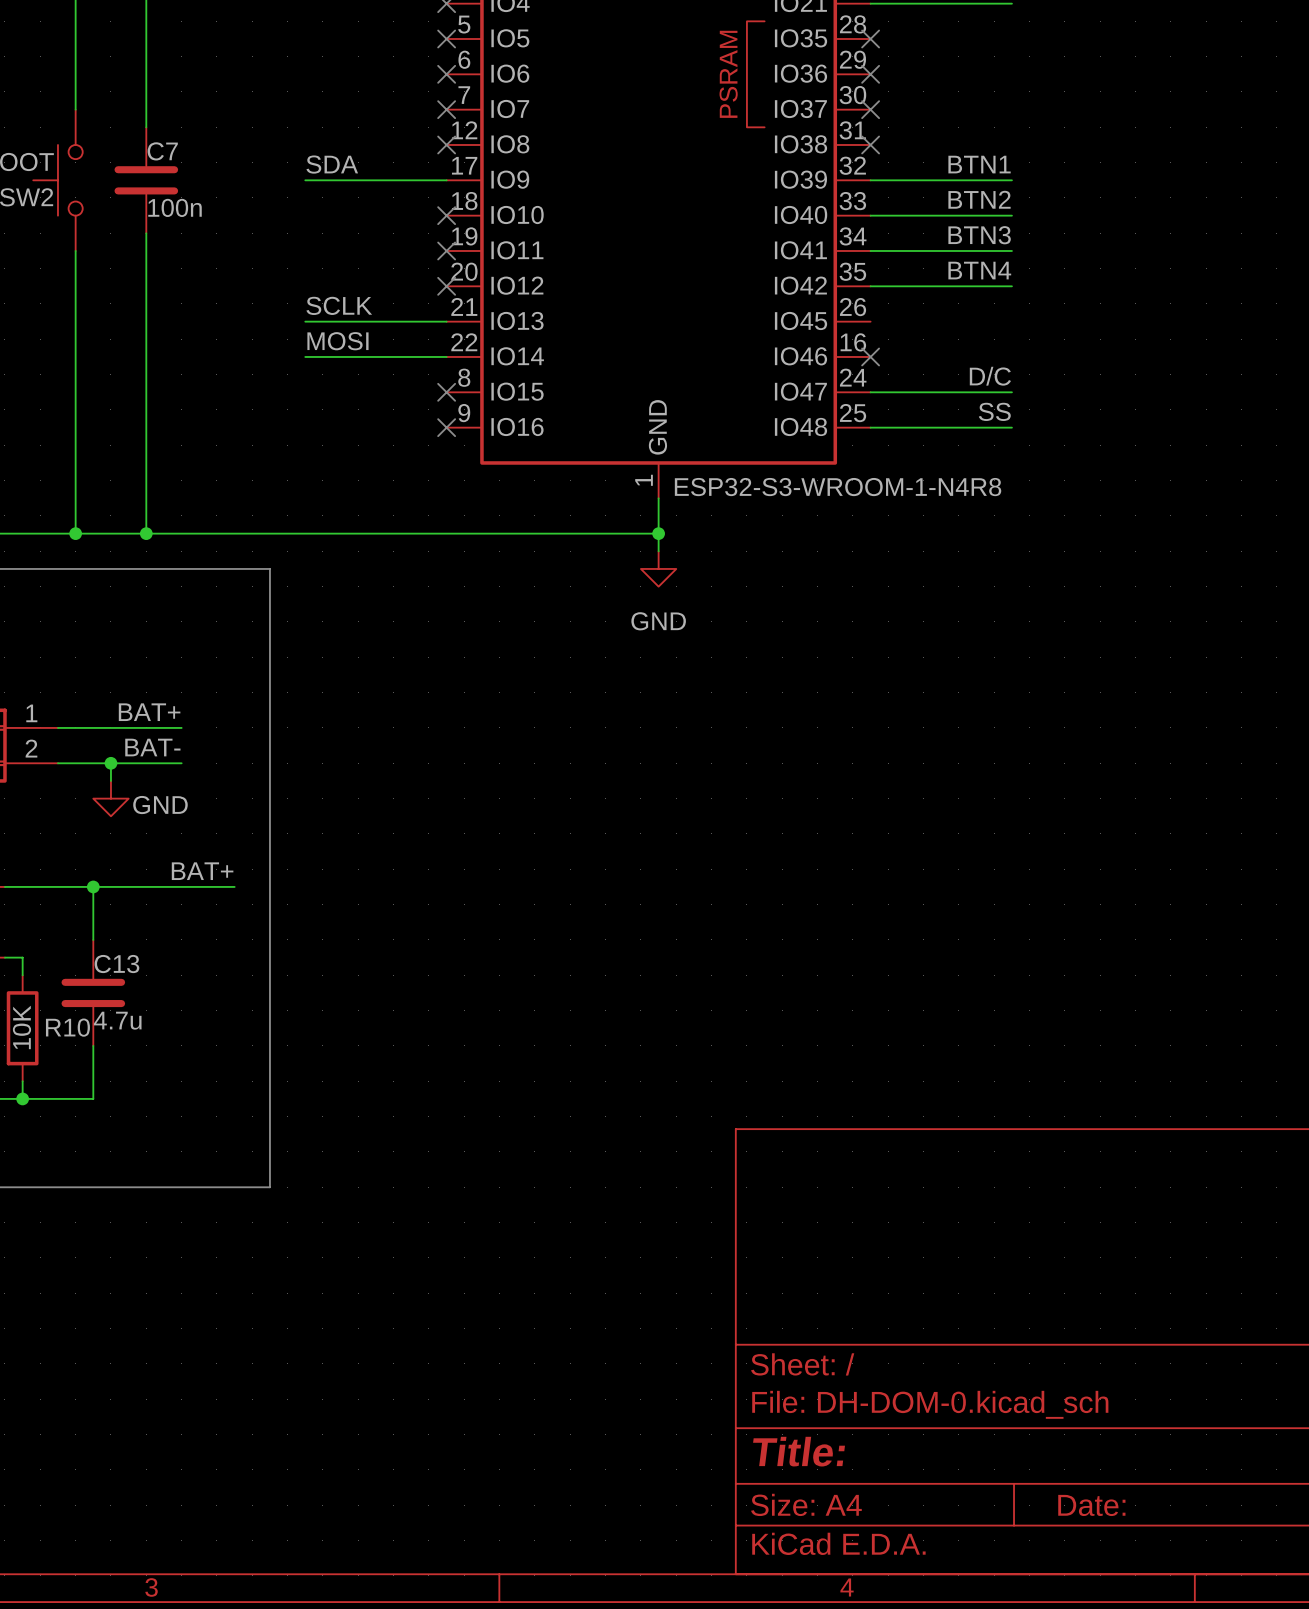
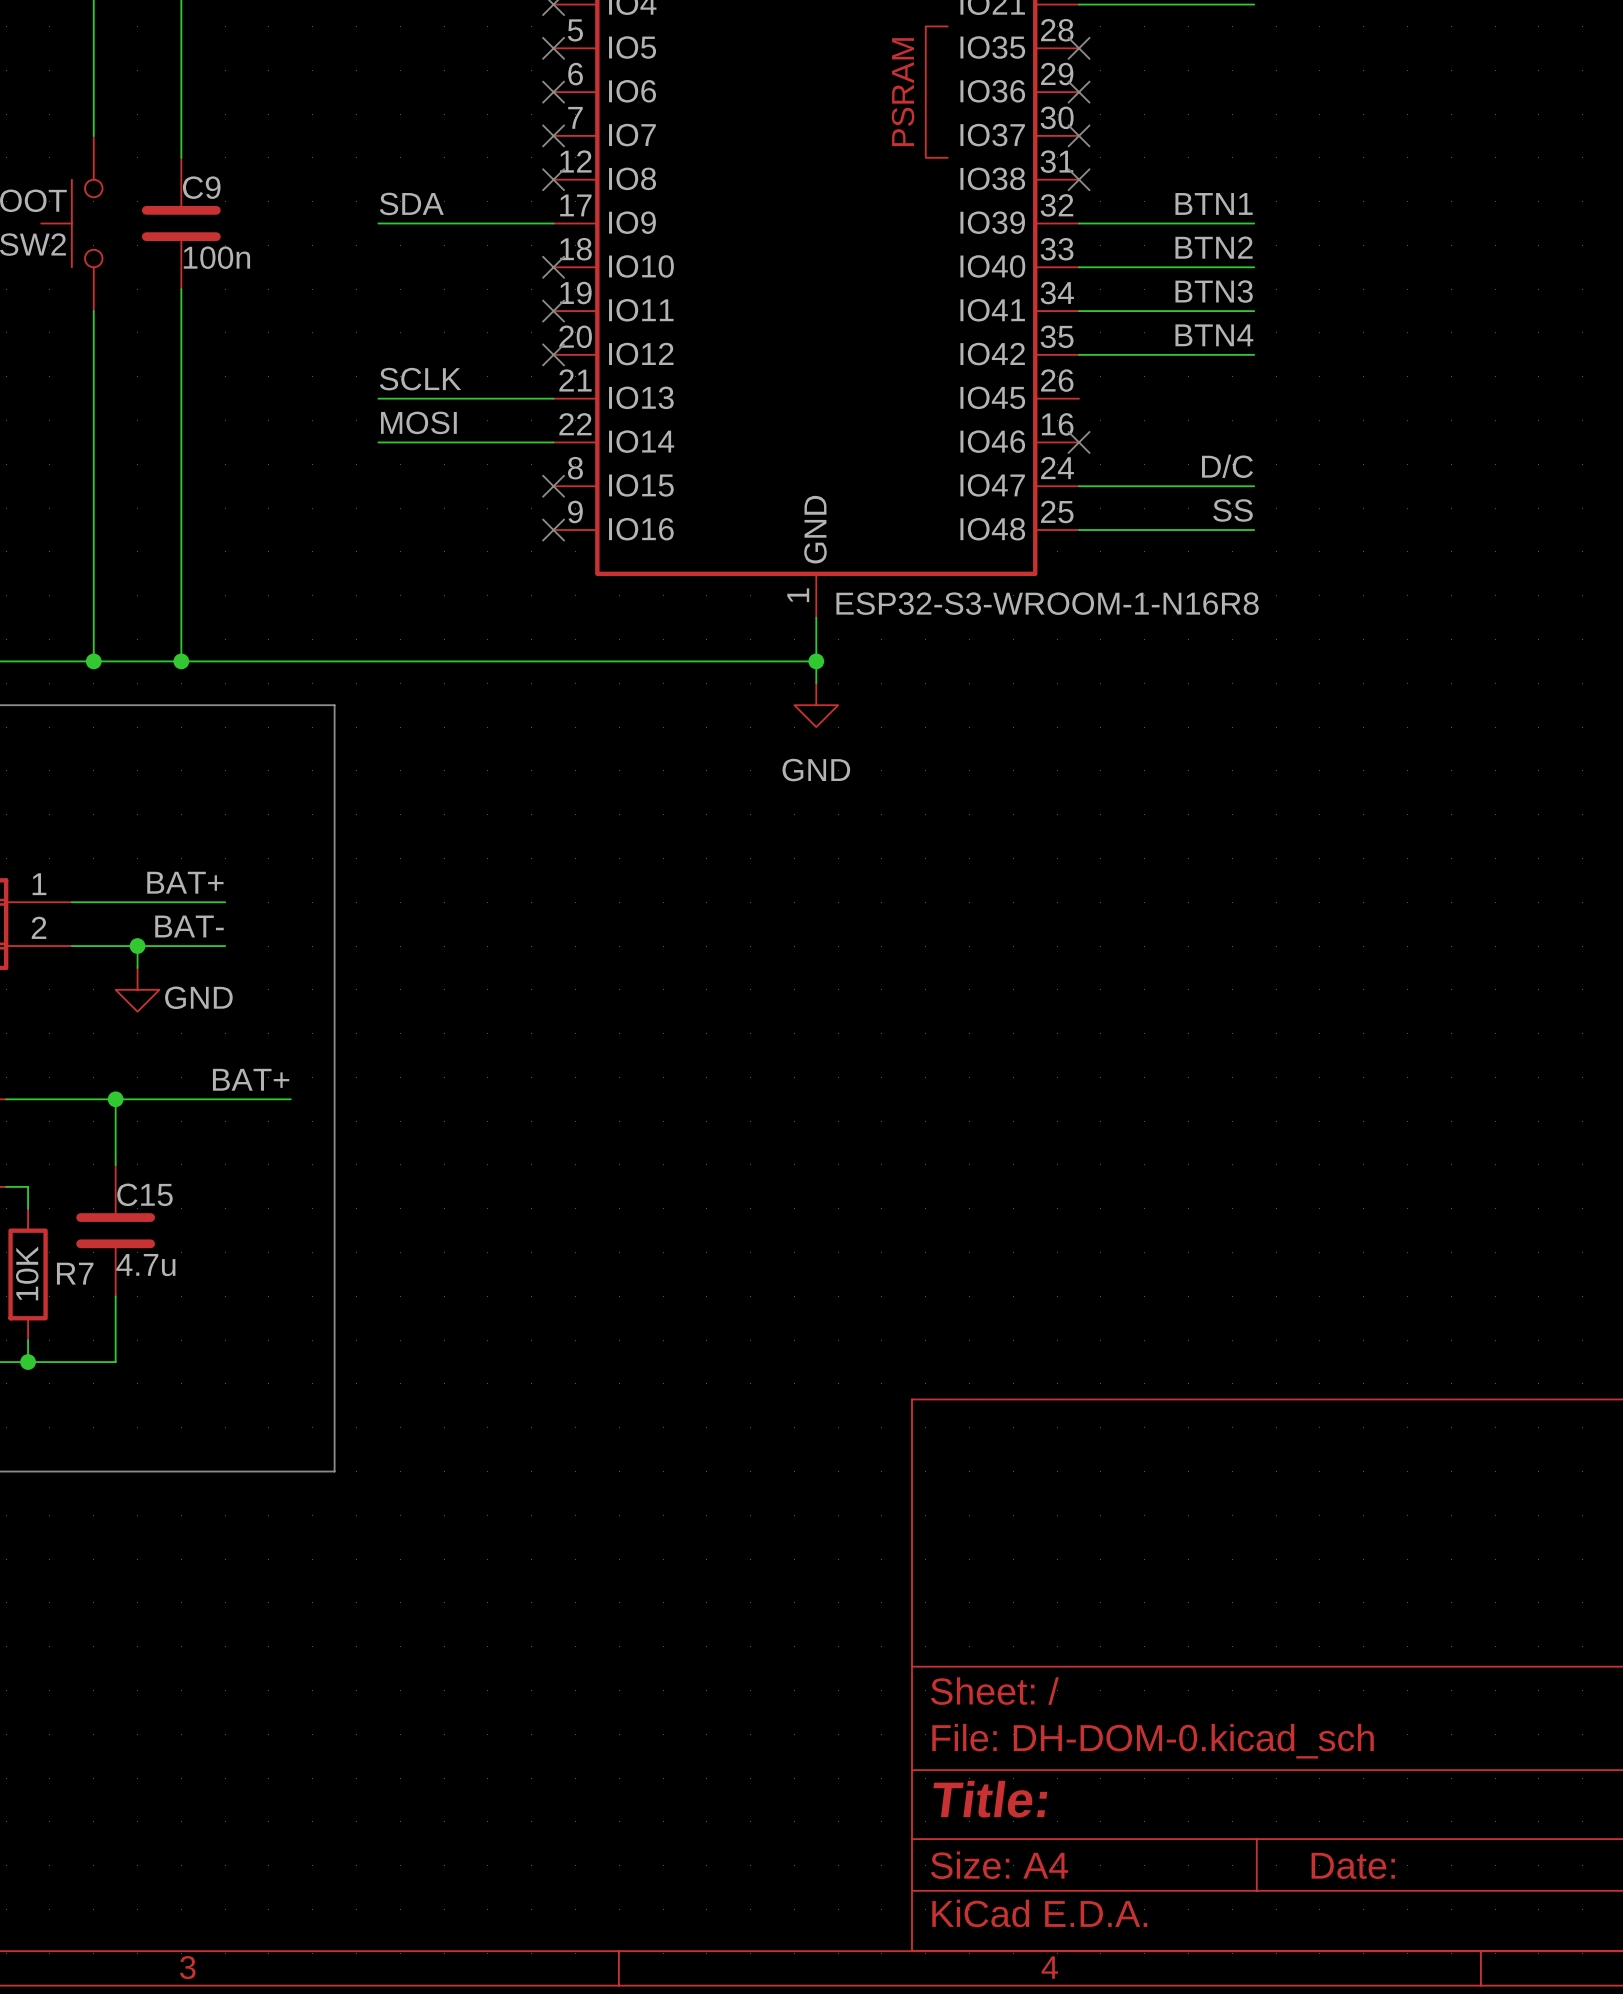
C7 name: C7 (162, 151) -> C9 (201, 187)
part value: ESP32-S3-WROOM-1-N4R8 (838, 487) -> ESP32-S3-WROOM-1-N16R8 (1047, 603)
C13 name: C13 (116, 964) -> C15 (144, 1194)
R10 name: R10 (67, 1027) -> R7 (75, 1273)

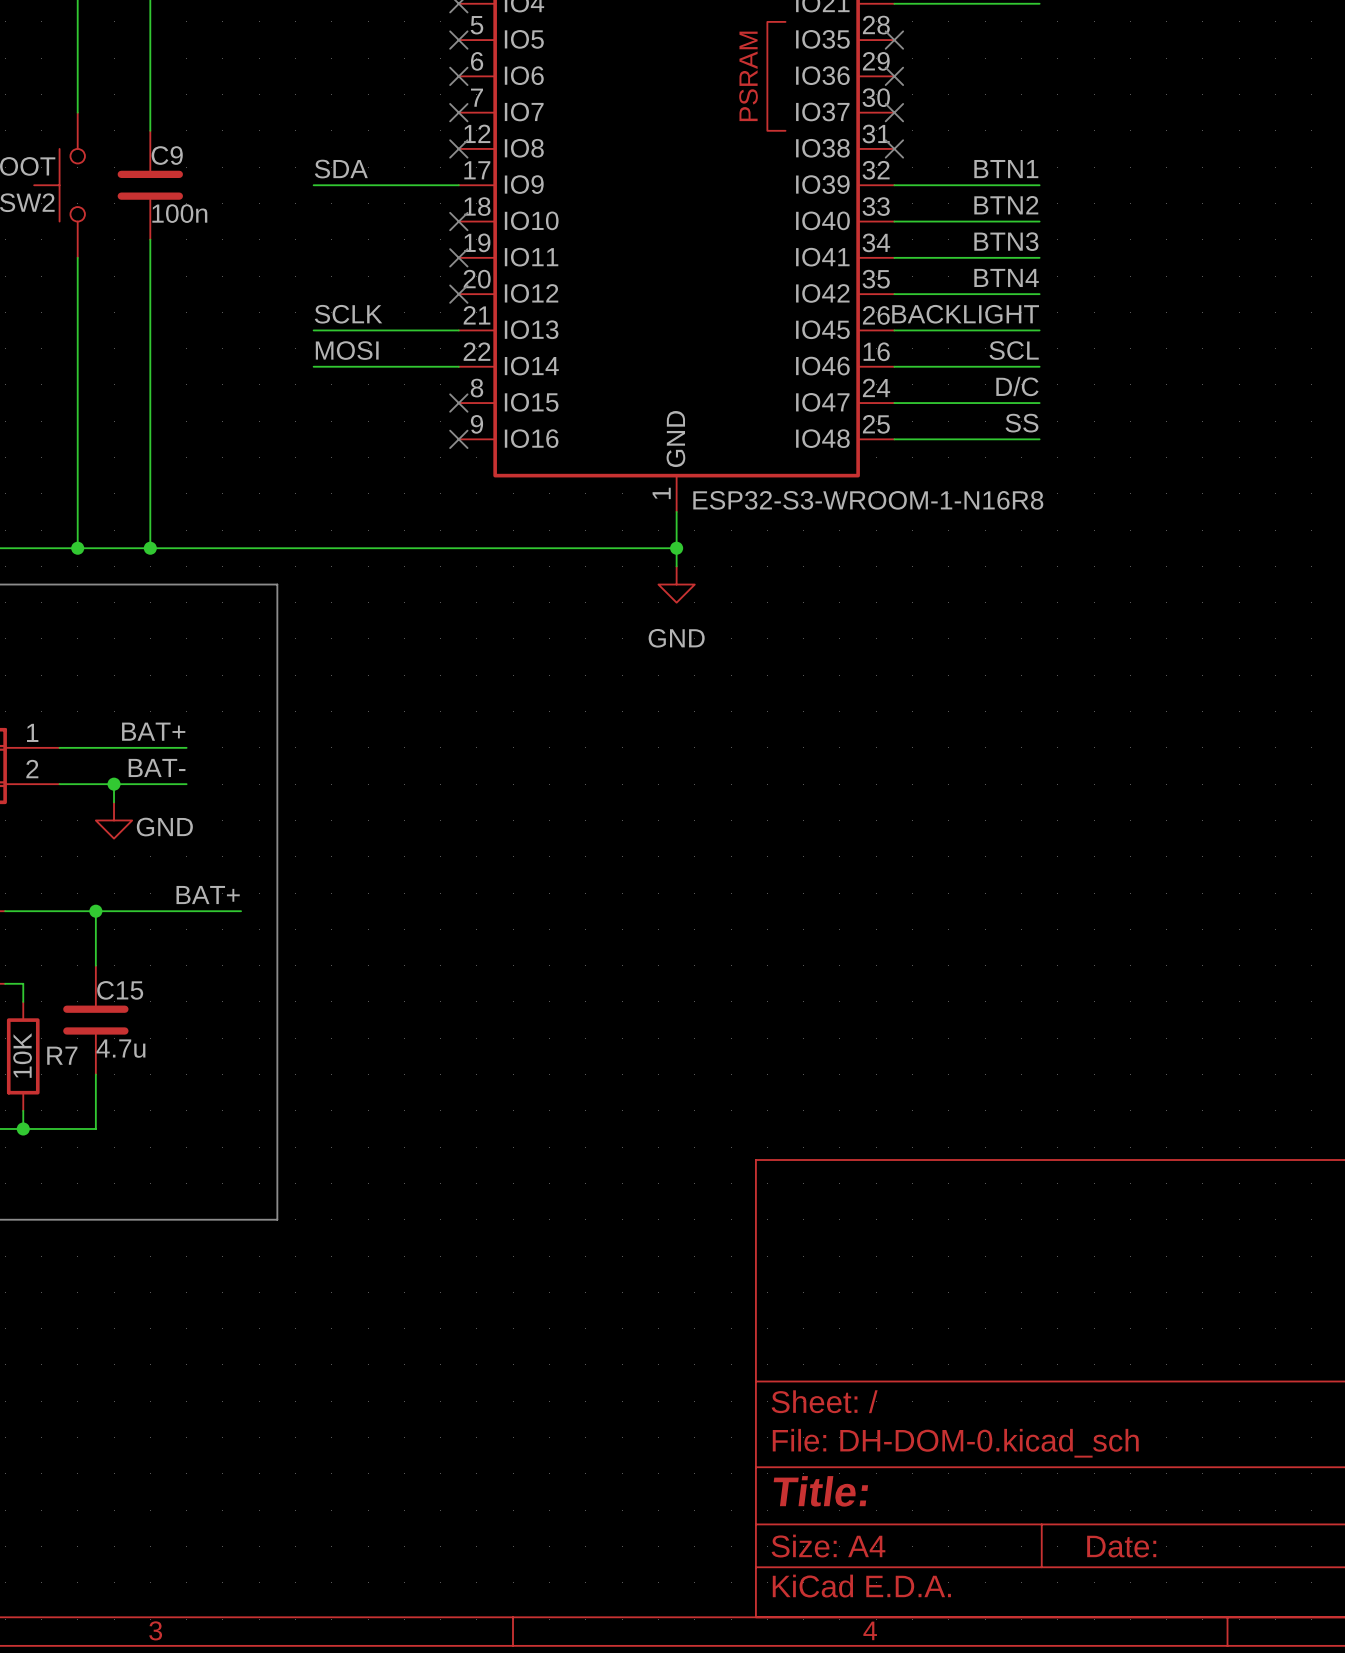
label: none -> BACKLIGHT (965, 314)
wire: none -> (894, 330) (1039, 330)
label: none -> SCL (1014, 350)
wire: none -> (894, 366) (1039, 366)
no-connect mark: (1079, 442) -> none

